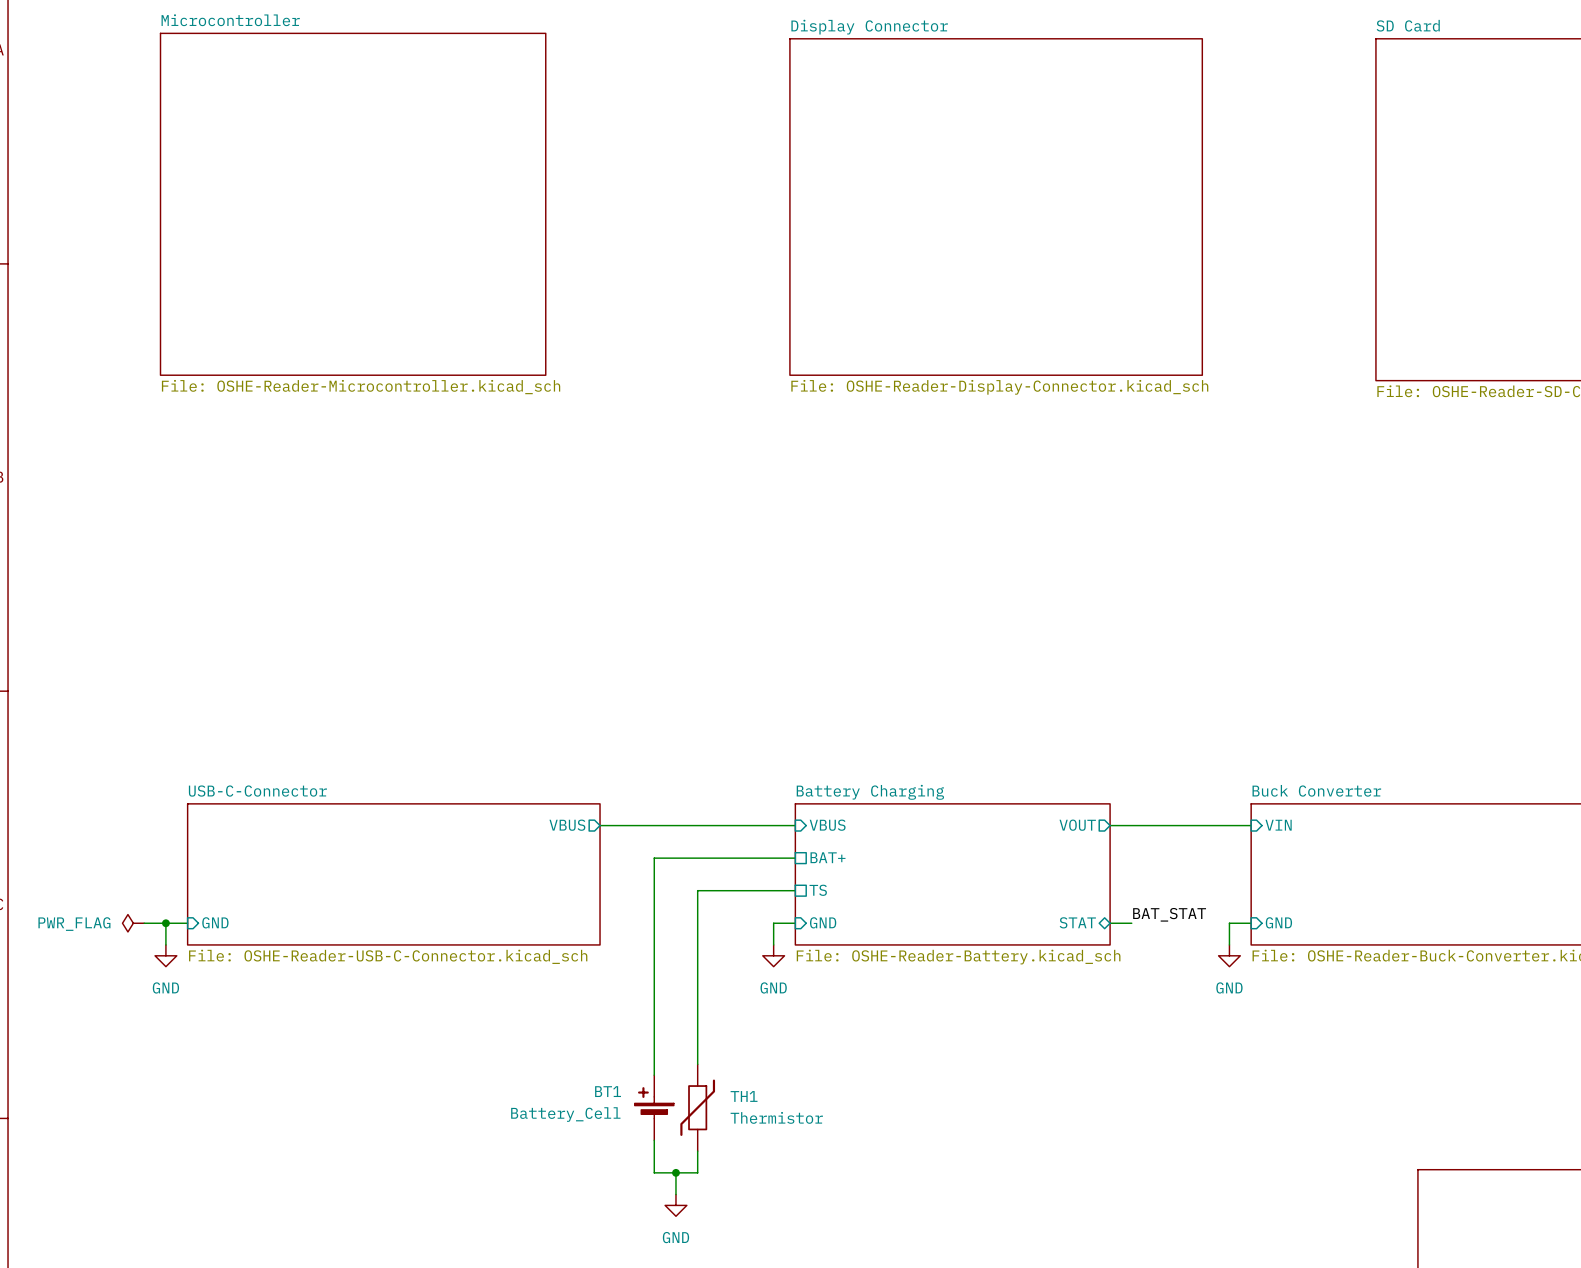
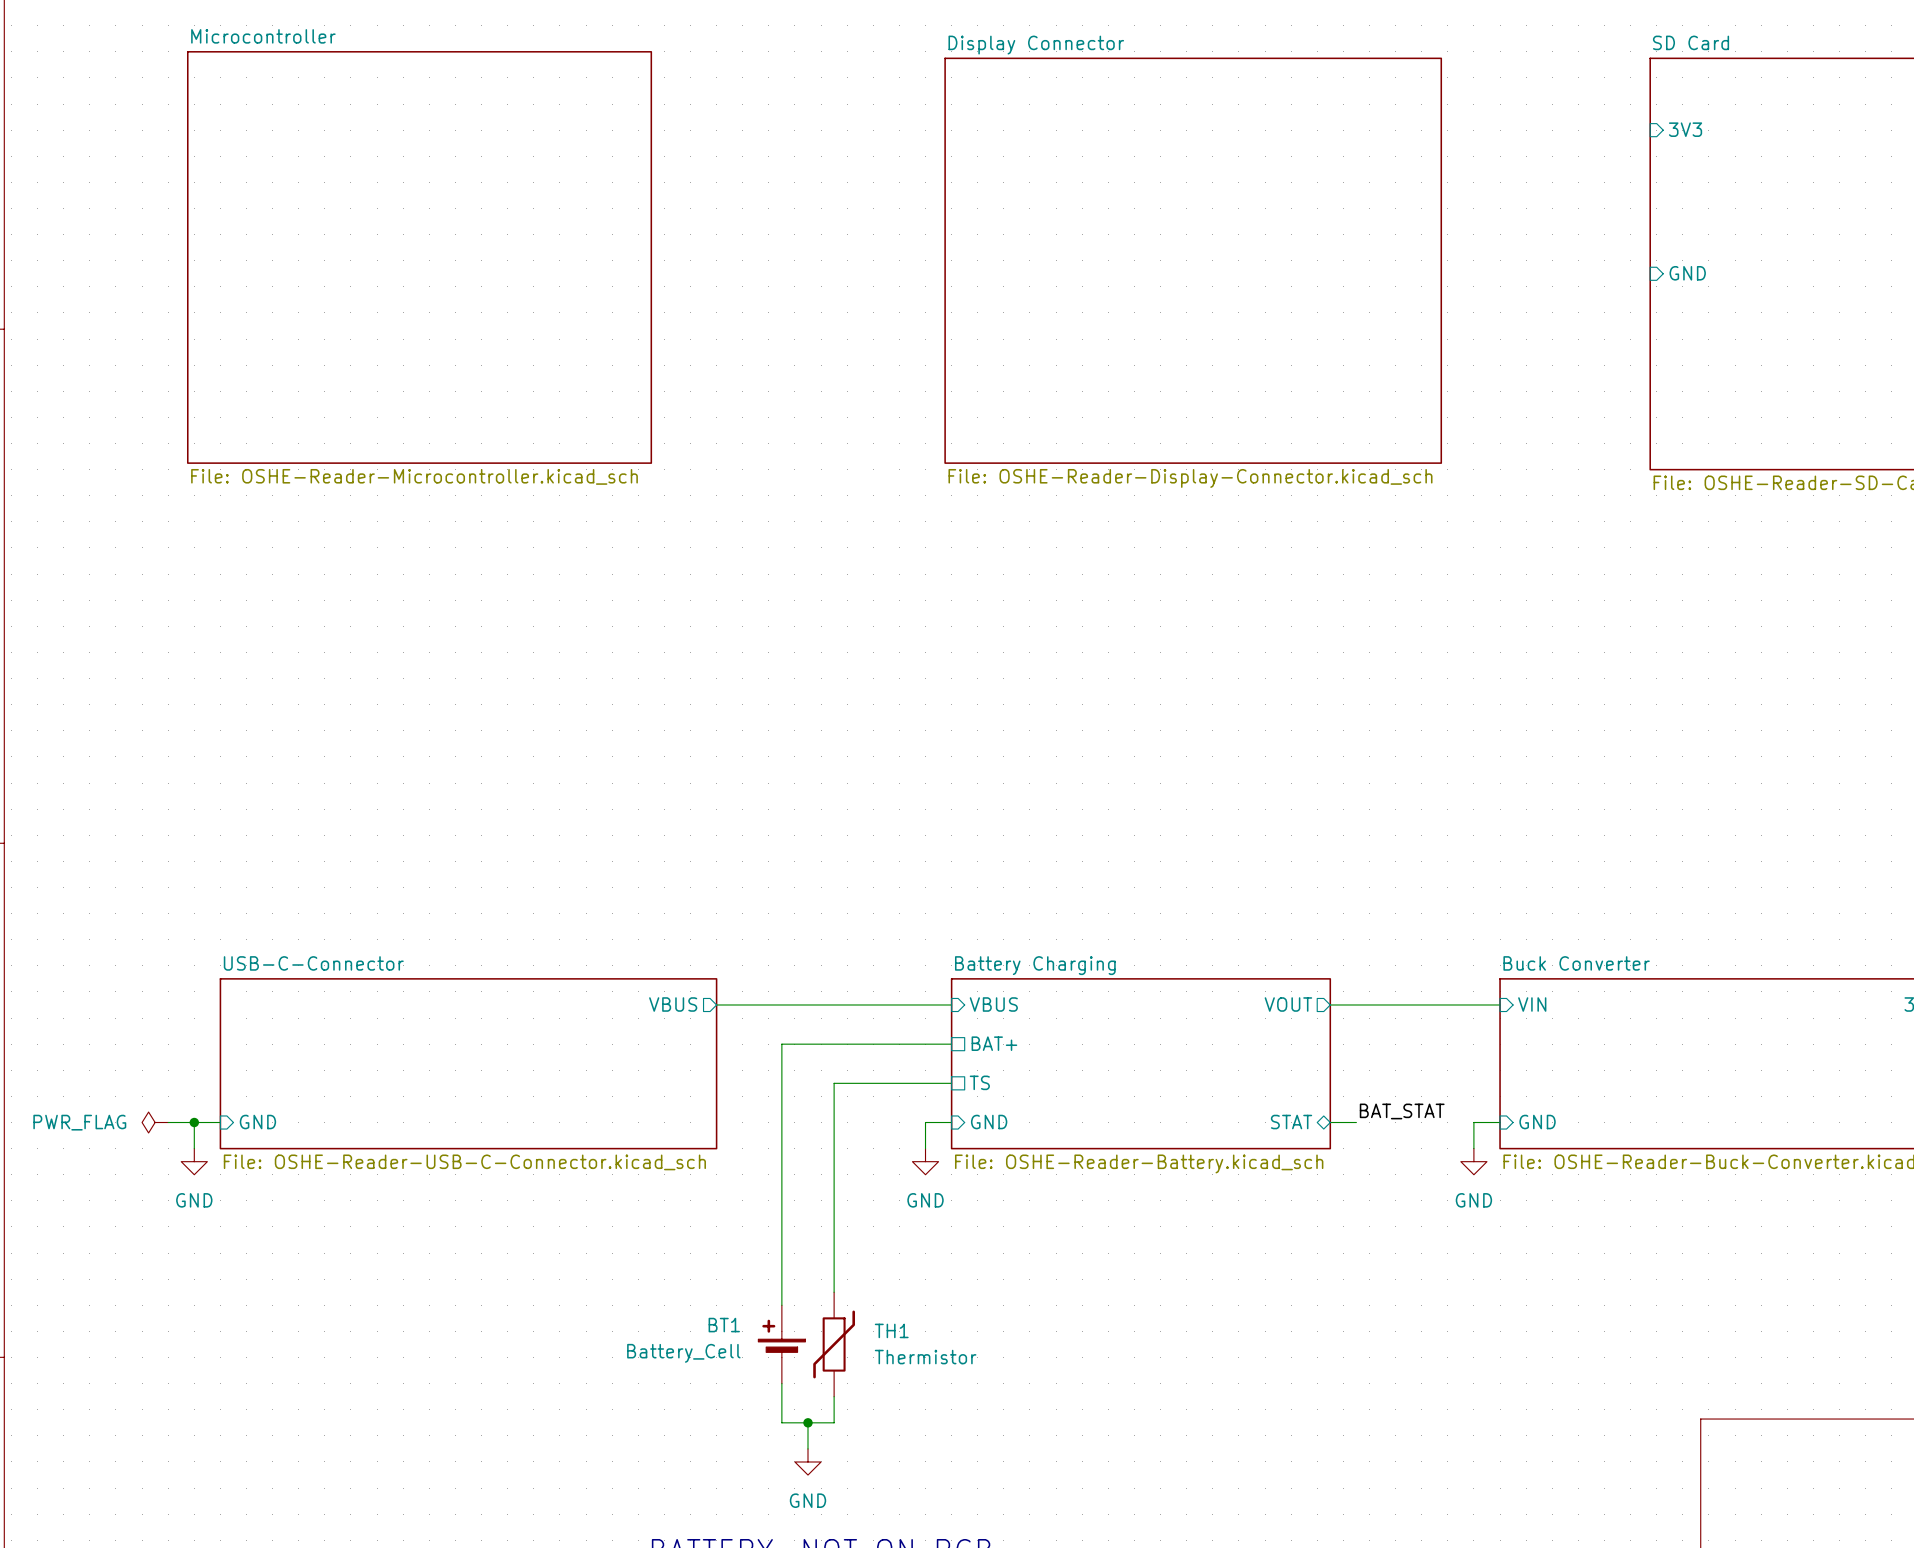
sheet pin: none -> 3V3 (1685, 129)
sheet pin: none -> GND (1687, 273)

